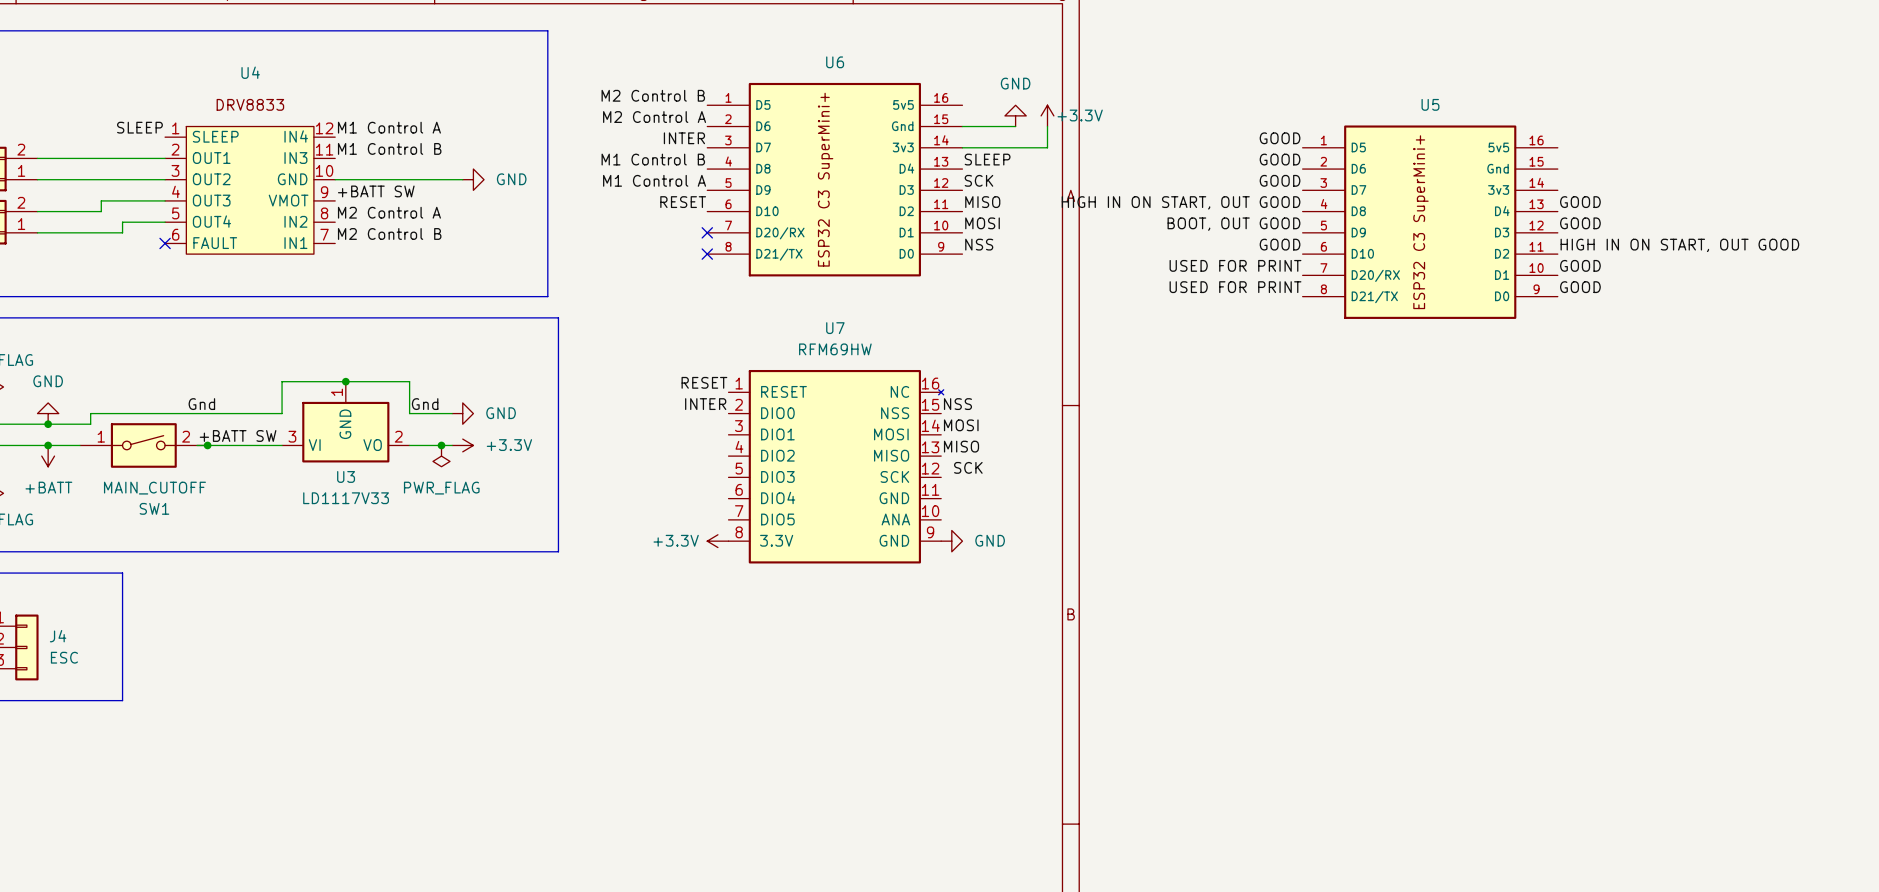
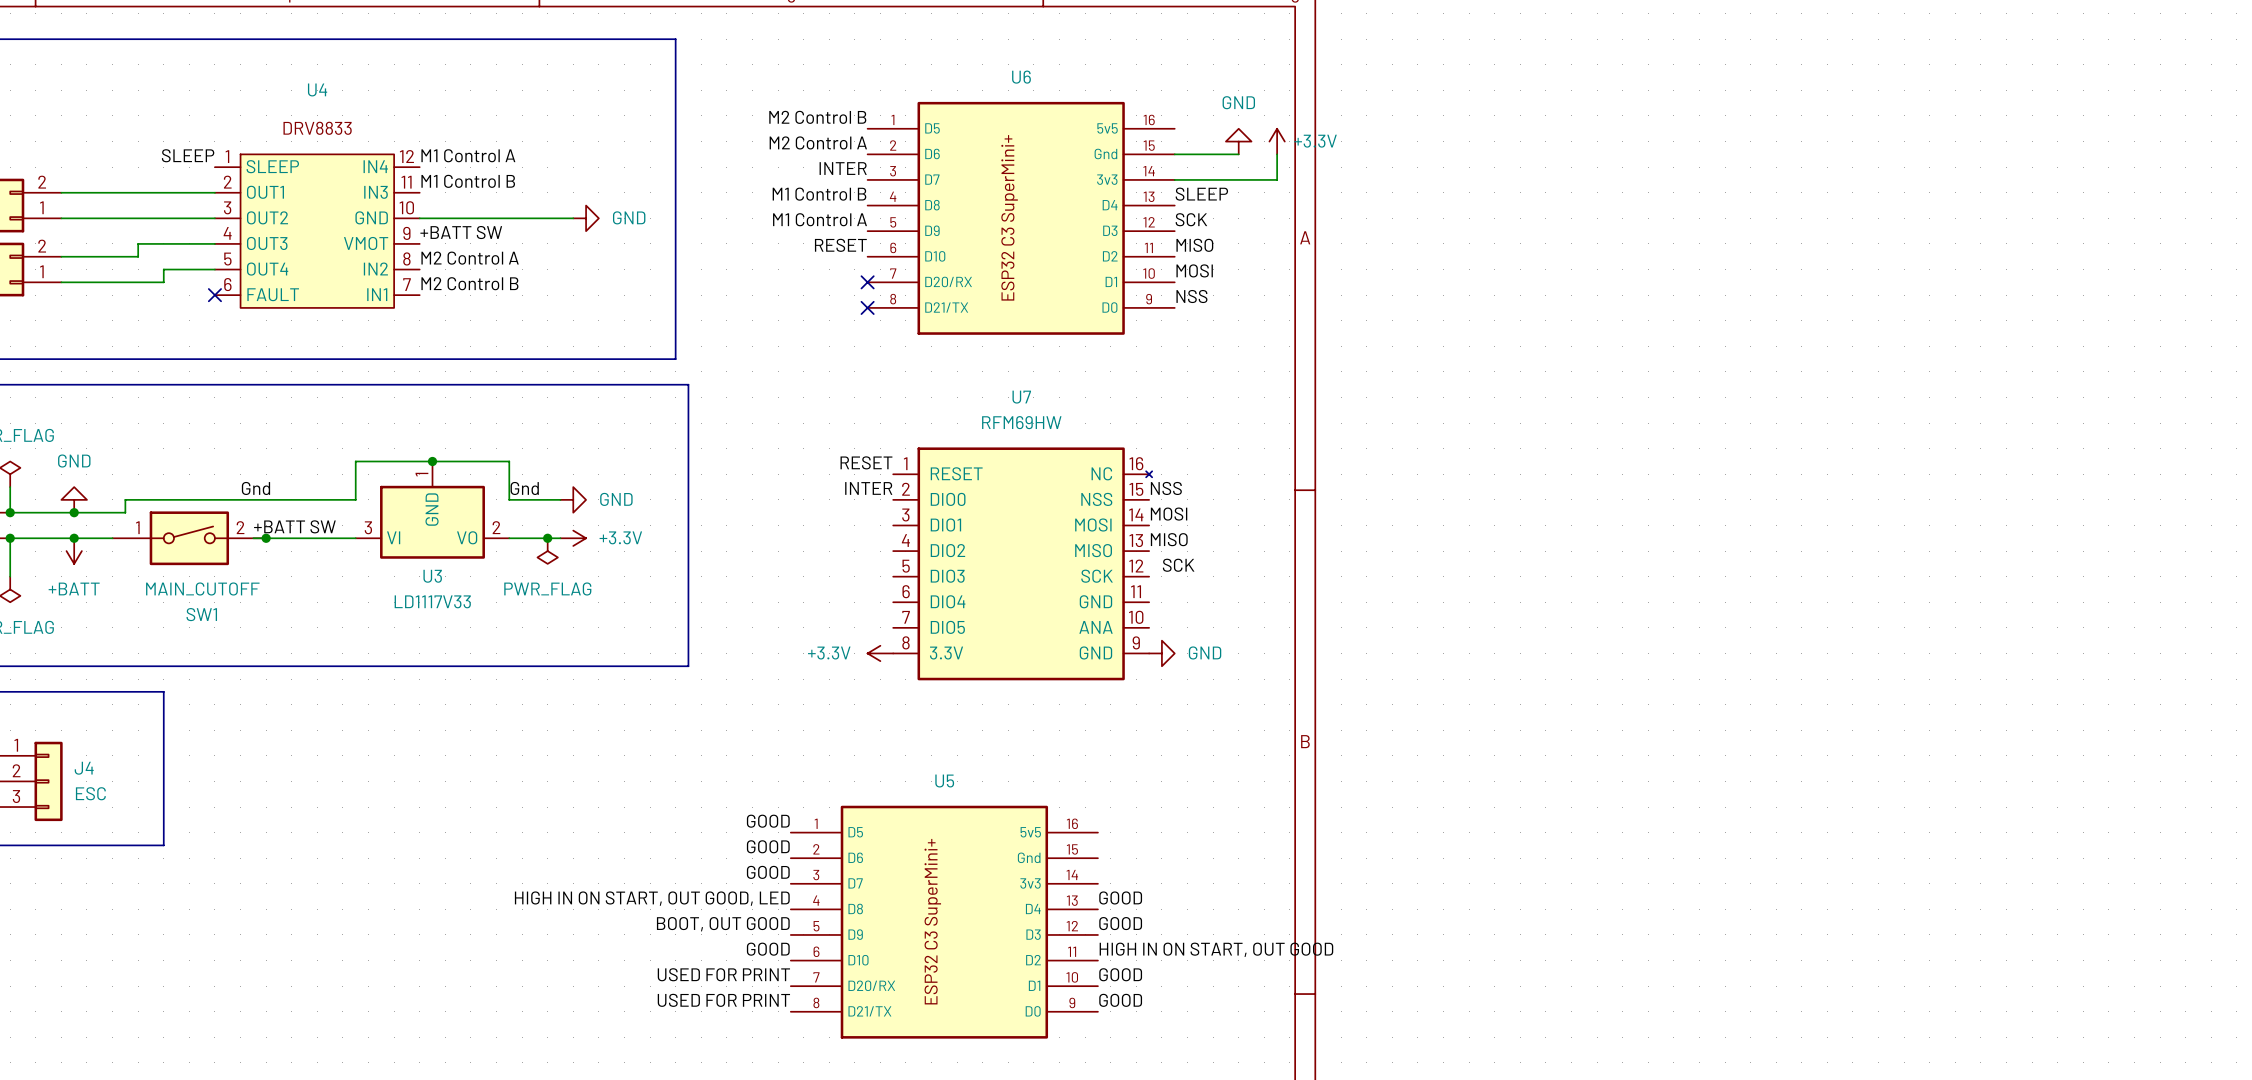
label: GOOD (1280, 138) -> none
label: GOOD (1280, 159) -> none
label: GOOD (1280, 180) -> none
label: HIGH IN ON START, OUT GOOD (1181, 202) -> none
label: GOOD (1580, 202) -> none
U5 position: (1430, 222) -> (944, 922)
label: GOOD (1580, 223) -> none
label: BOOT, OUT GOOD (1233, 224) -> none
label: GOOD (1280, 244) -> none
label: HIGH IN ON START, OUT GOOD (1679, 245) -> none
label: USED FOR PRINT (1235, 265) -> none
label: GOOD (1580, 265) -> none
label: USED FOR PRINT (1235, 287) -> none
label: GOOD (1580, 287) -> none
label: none -> GOOD (768, 821)
label: none -> GOOD (768, 846)
label: none -> GOOD (768, 872)
label: none -> GOOD (1120, 897)
label: none -> HIGH IN ON START, OUT GOOD, LED (652, 898)
label: none -> GOOD (1120, 923)
label: none -> BOOT, OUT GOOD (723, 924)
label: none -> GOOD (768, 949)
label: none -> HIGH IN ON START, OUT GOOD (1216, 949)
label: none -> USED FOR PRINT (723, 974)
label: none -> GOOD (1120, 974)
label: none -> USED FOR PRINT (723, 1000)
label: none -> GOOD (1120, 1000)

